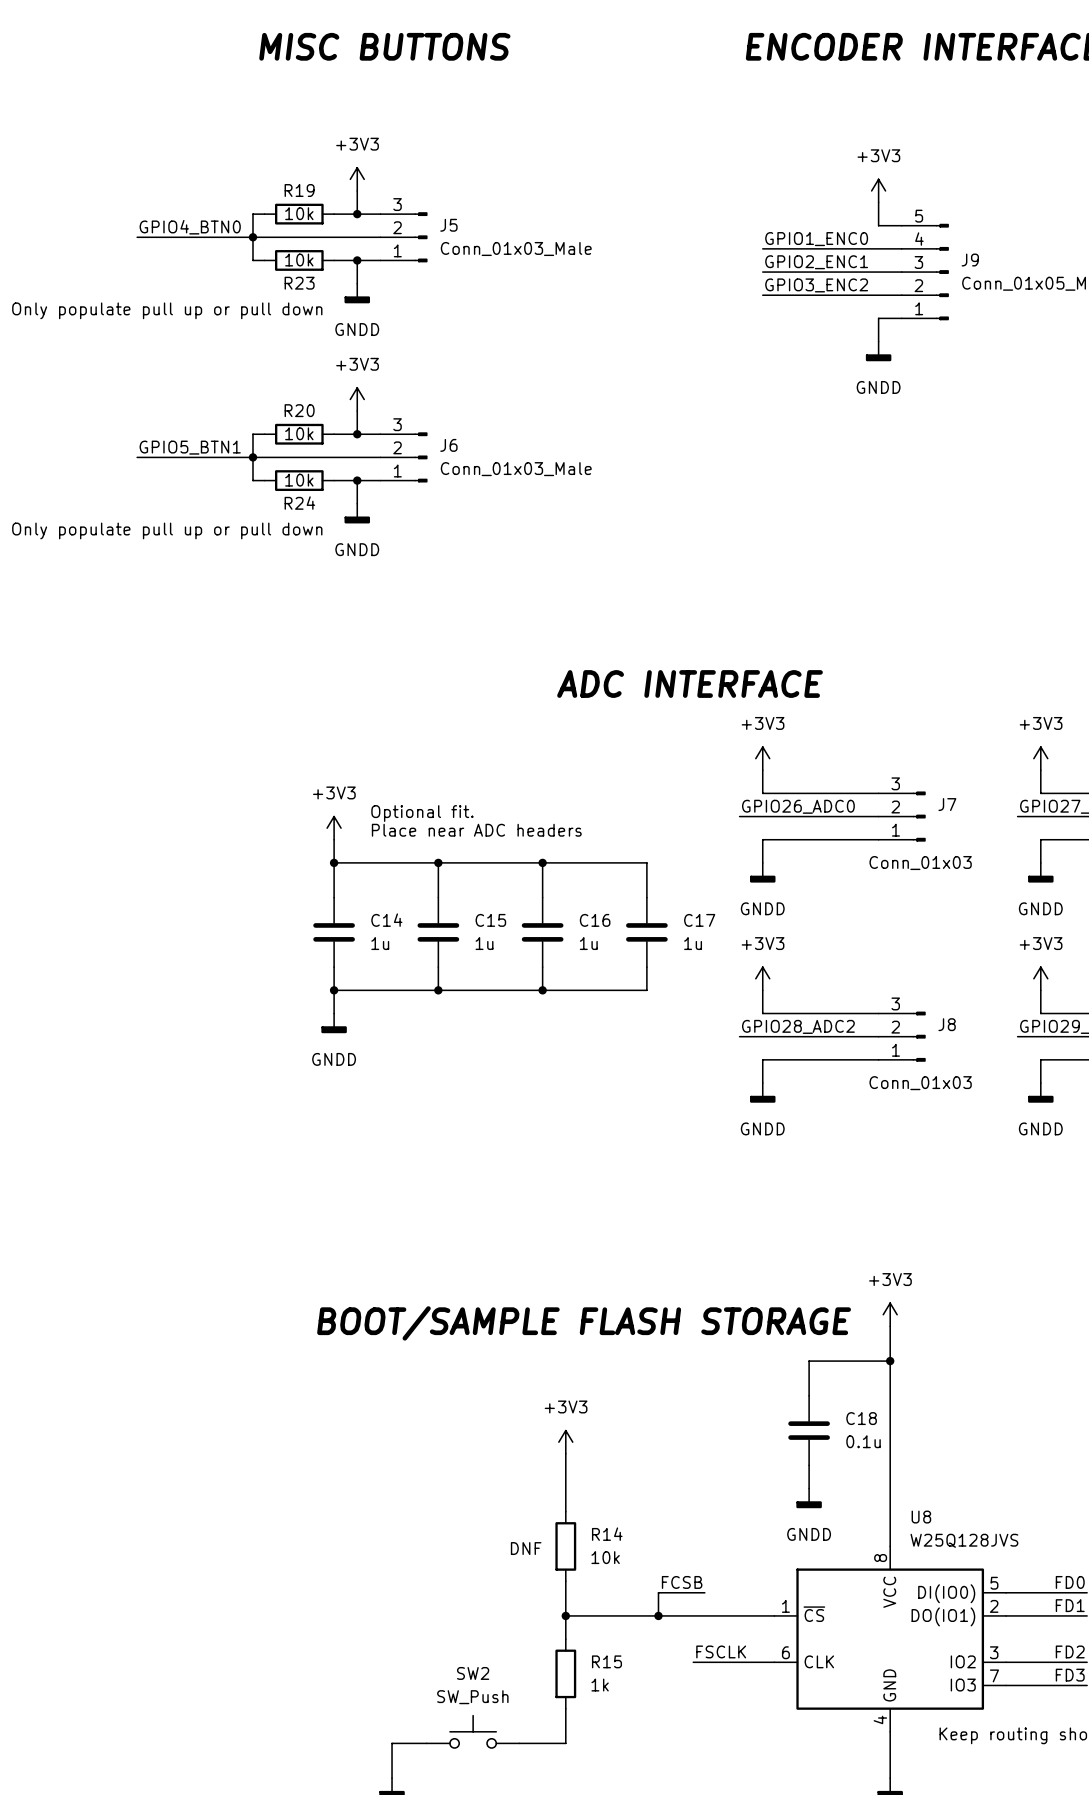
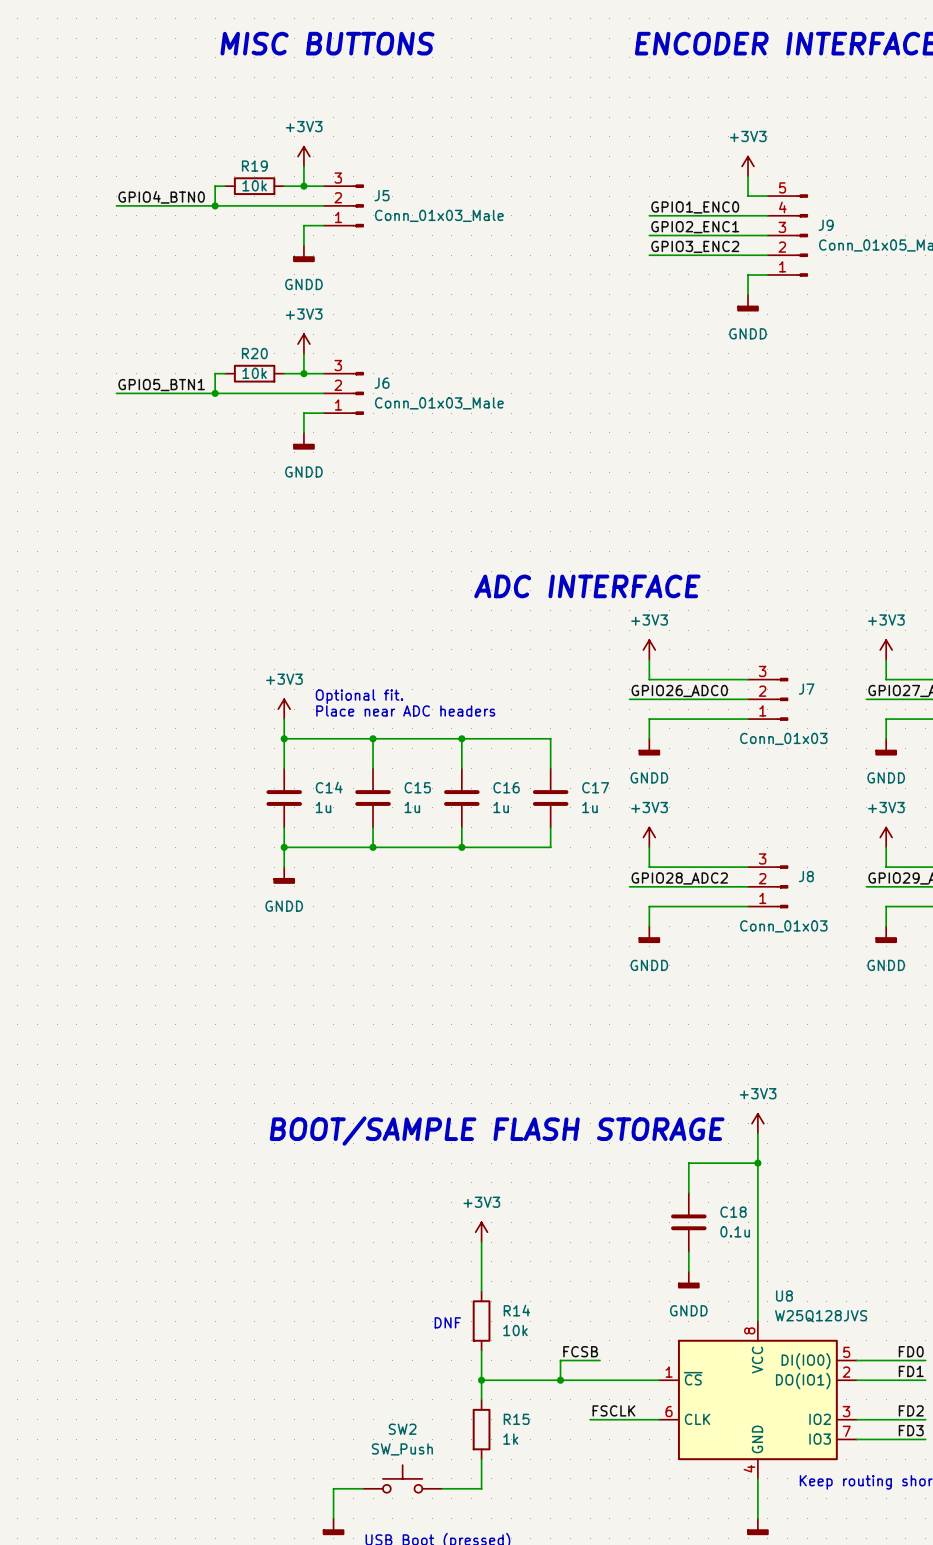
wire: (252, 237) (252, 260) (264, 260) -> none
R23: 10k (299, 260) -> none
wire: (334, 260) (357, 260) -> none
junction: (357, 260) -> none
text: Only populate pull up or pull down (167, 310) -> none
wire: (252, 457) (252, 480) (264, 480) -> none
R24: 10k (299, 480) -> none
wire: (334, 480) (357, 480) -> none
junction: (357, 480) -> none
text: Only populate pull up or pull down (167, 530) -> none

